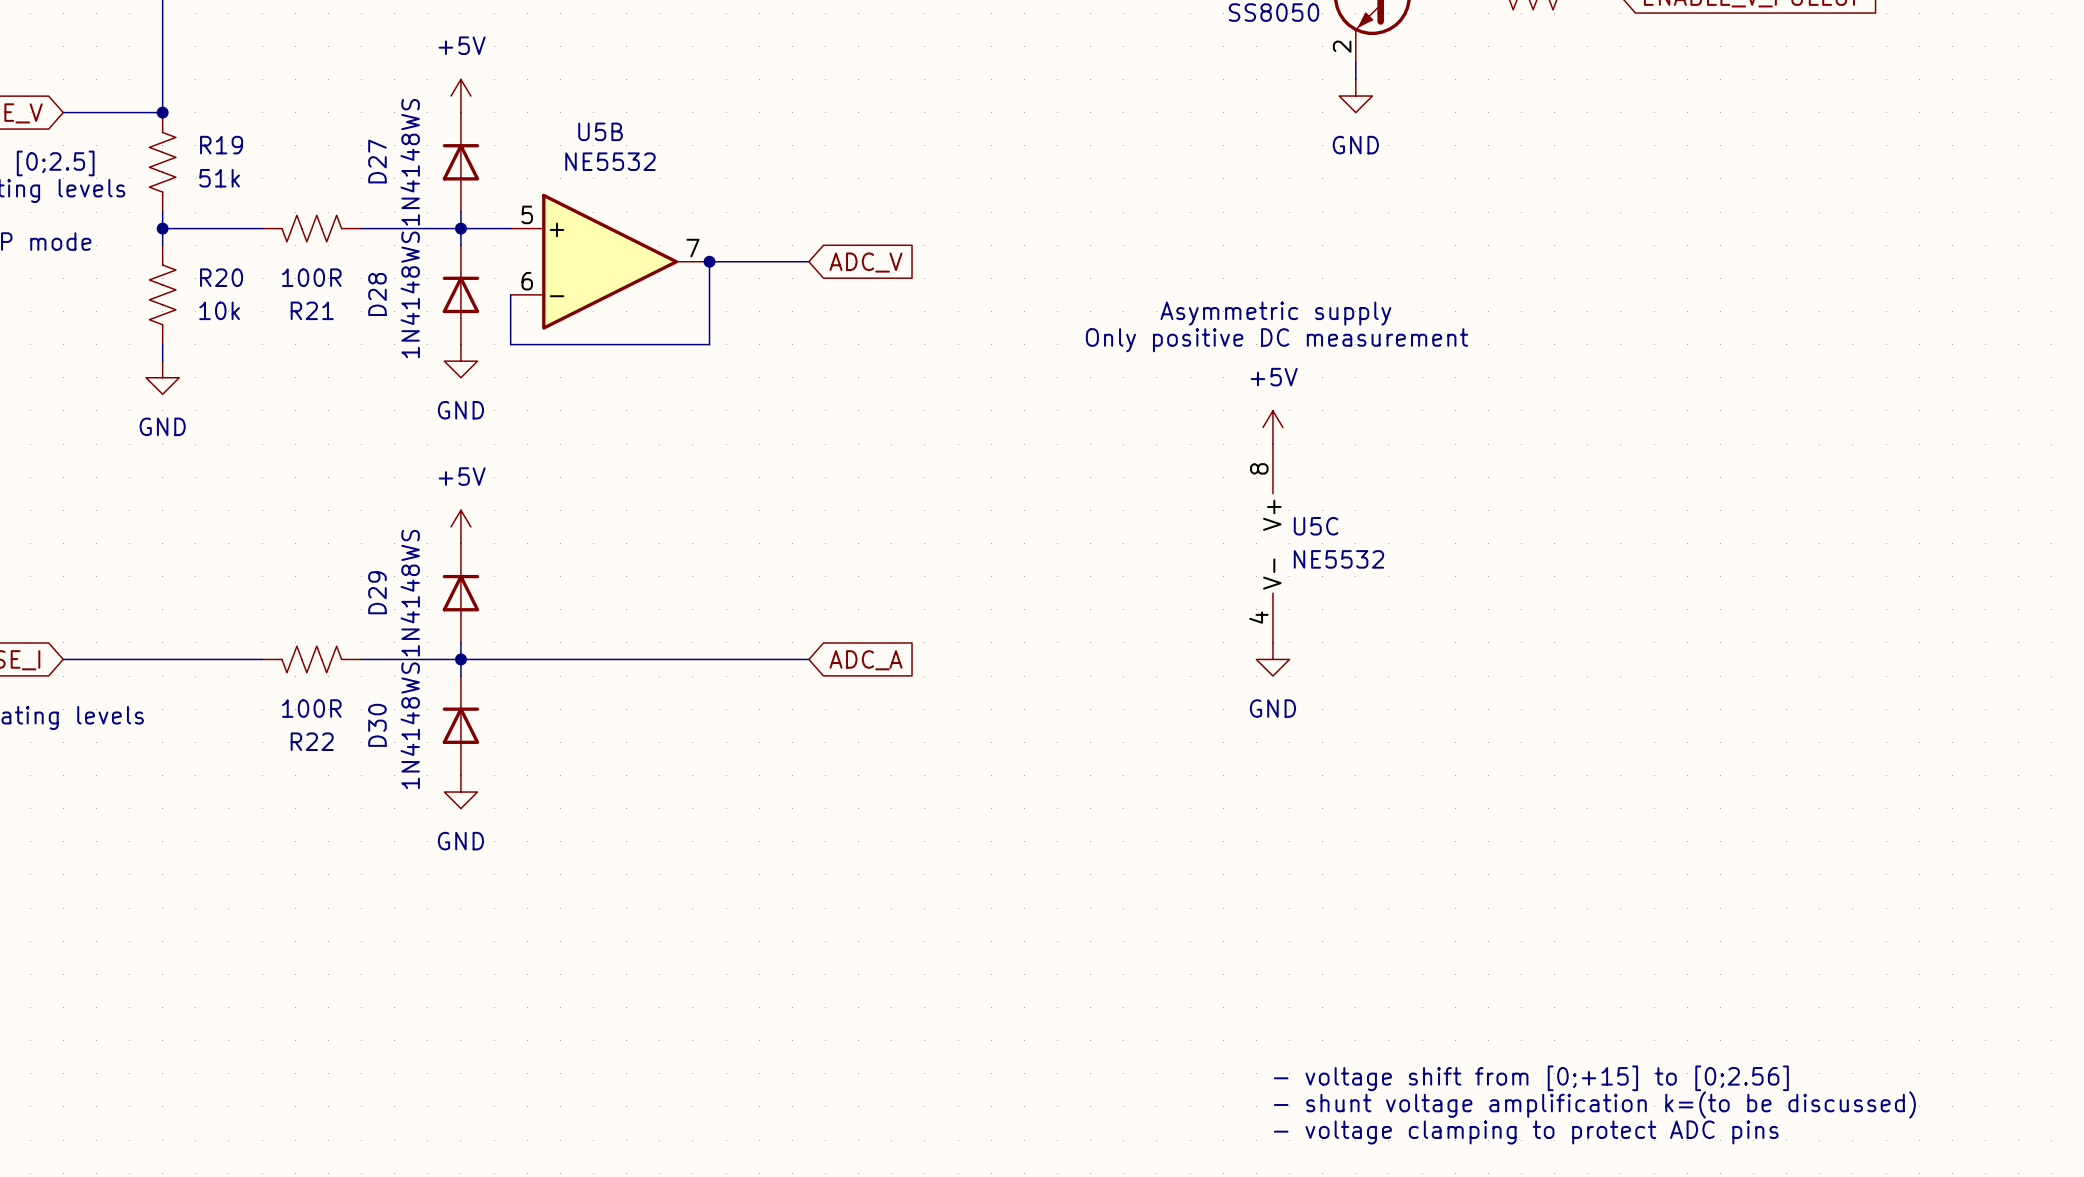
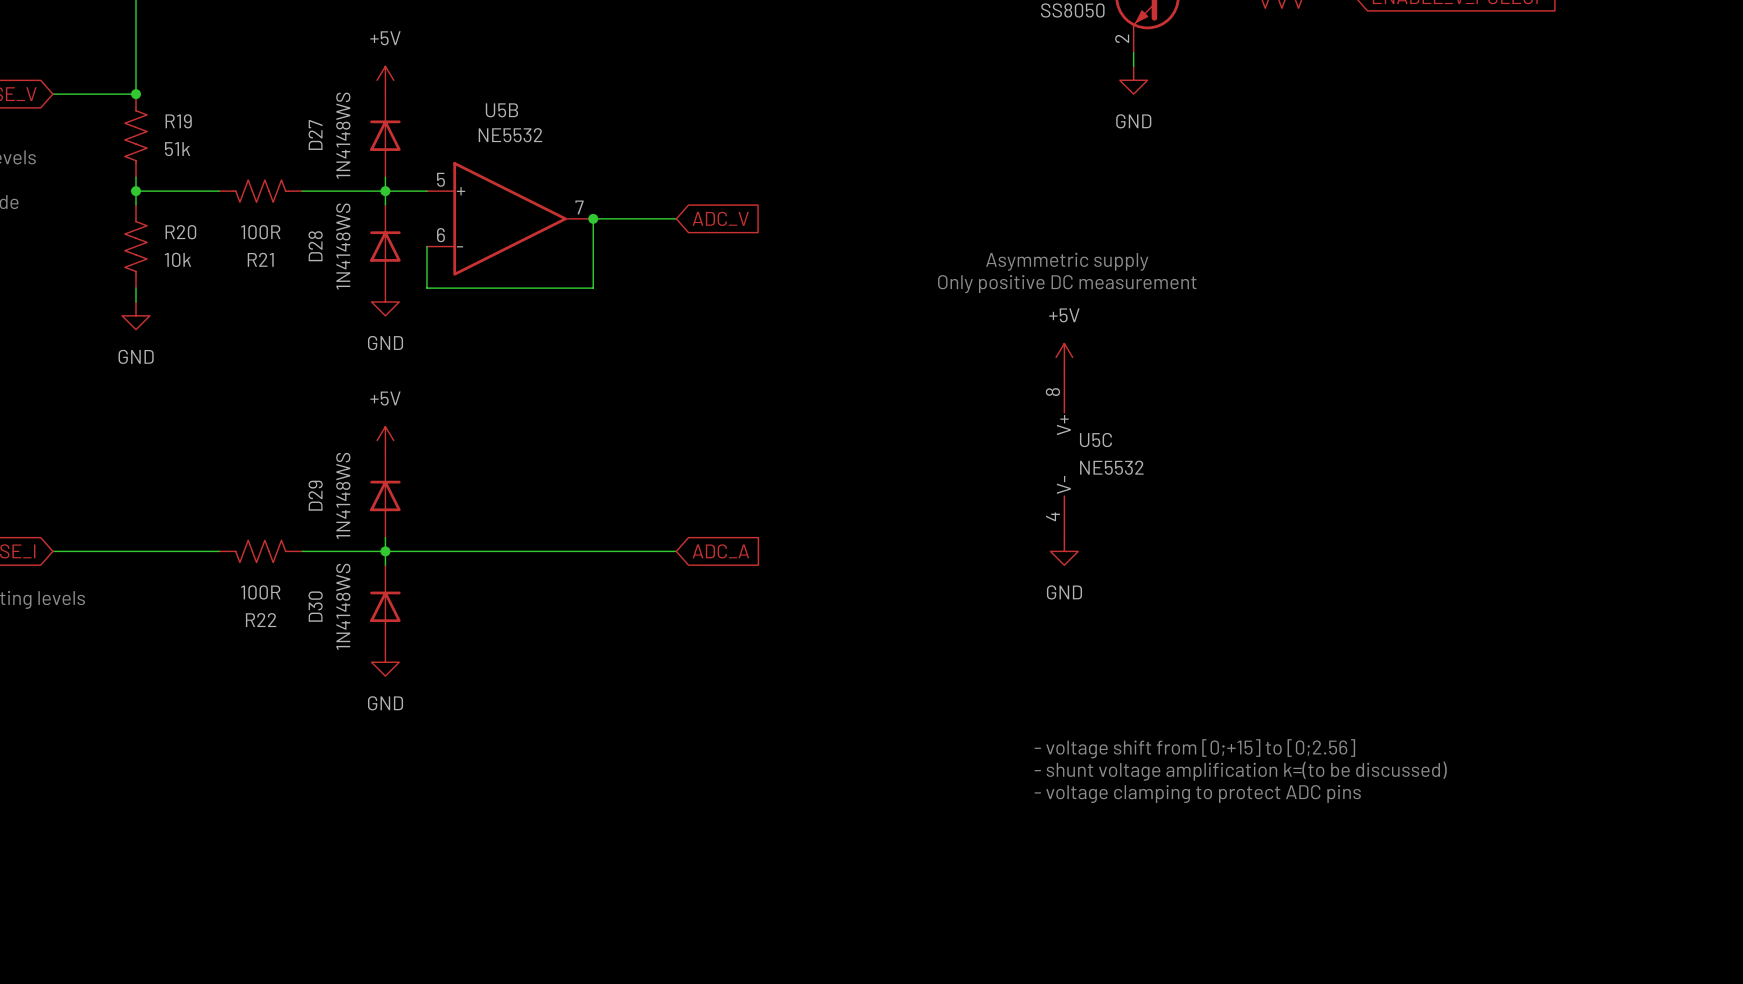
text position: - voltage shift from [0;+15] to [0;2.56] (1531, 1078) -> - voltage shift from [0;+15] to [0;2.56] (1194, 748)
text position: - shunt voltage amplification k=(to be discussed) (1594, 1104) -> - shunt voltage amplification k=(to be discussed) (1240, 771)
text position: - voltage clamping to protect ADC pins (1526, 1132) -> - voltage clamping to protect ADC pins (1197, 794)

